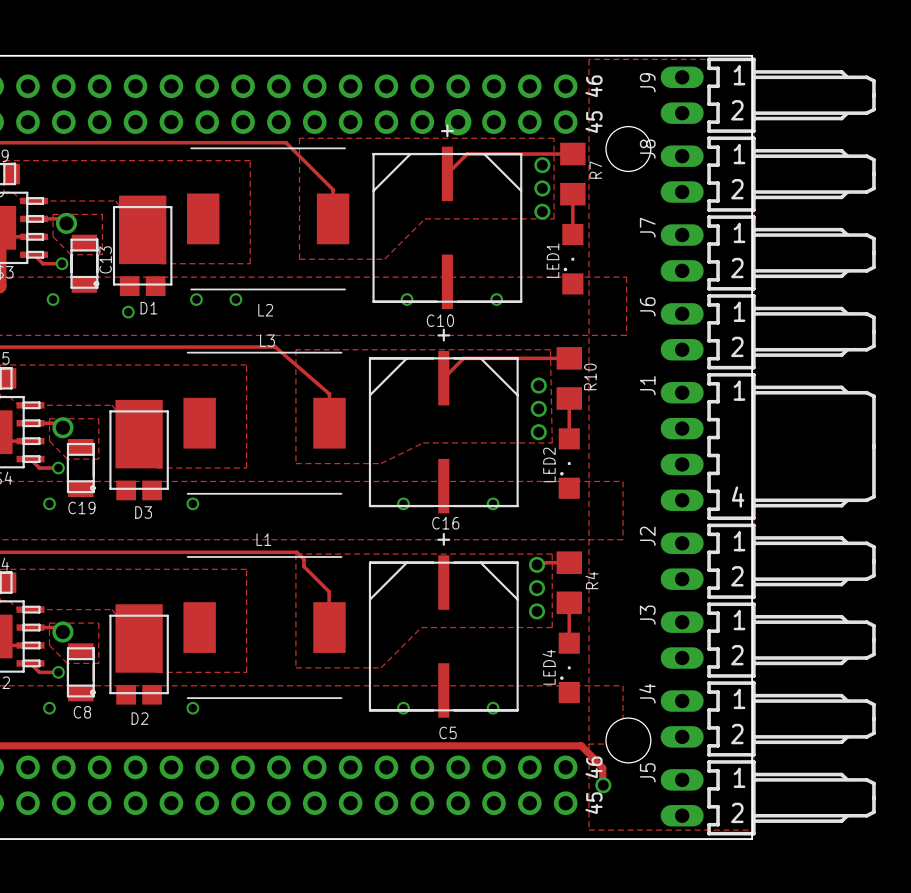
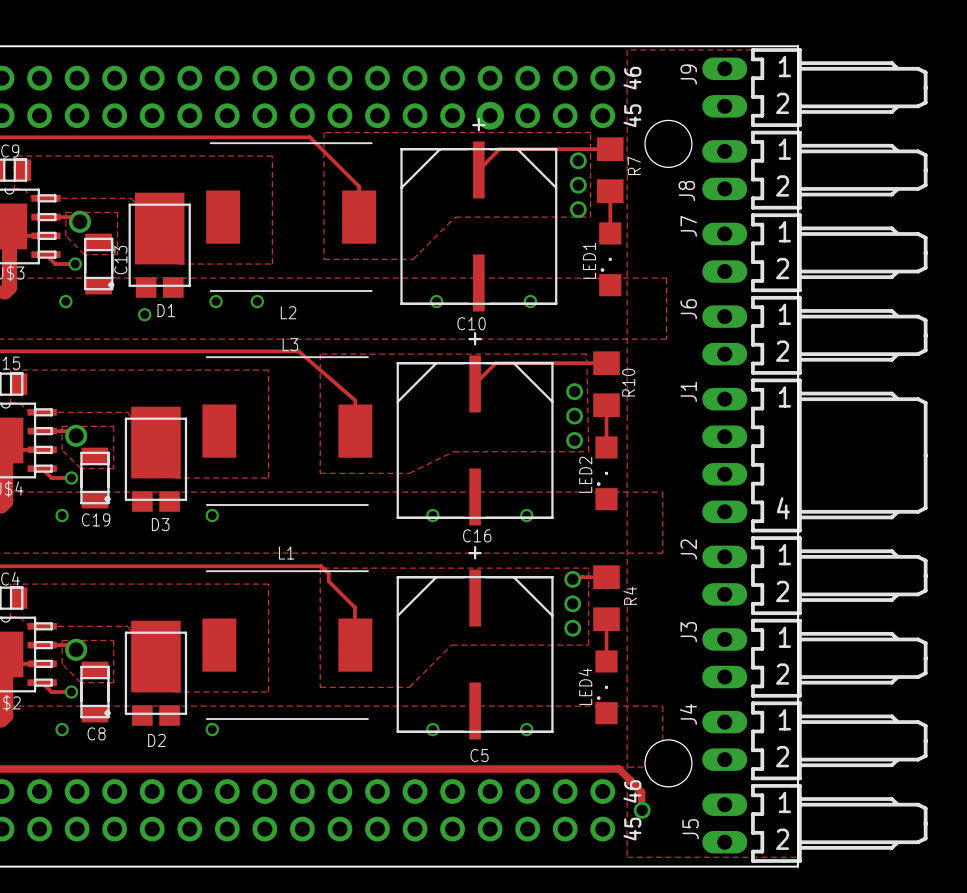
J8 name position: J8 (647, 149) -> J8 (686, 190)
J5 name position: J5 (647, 772) -> J5 (690, 829)

